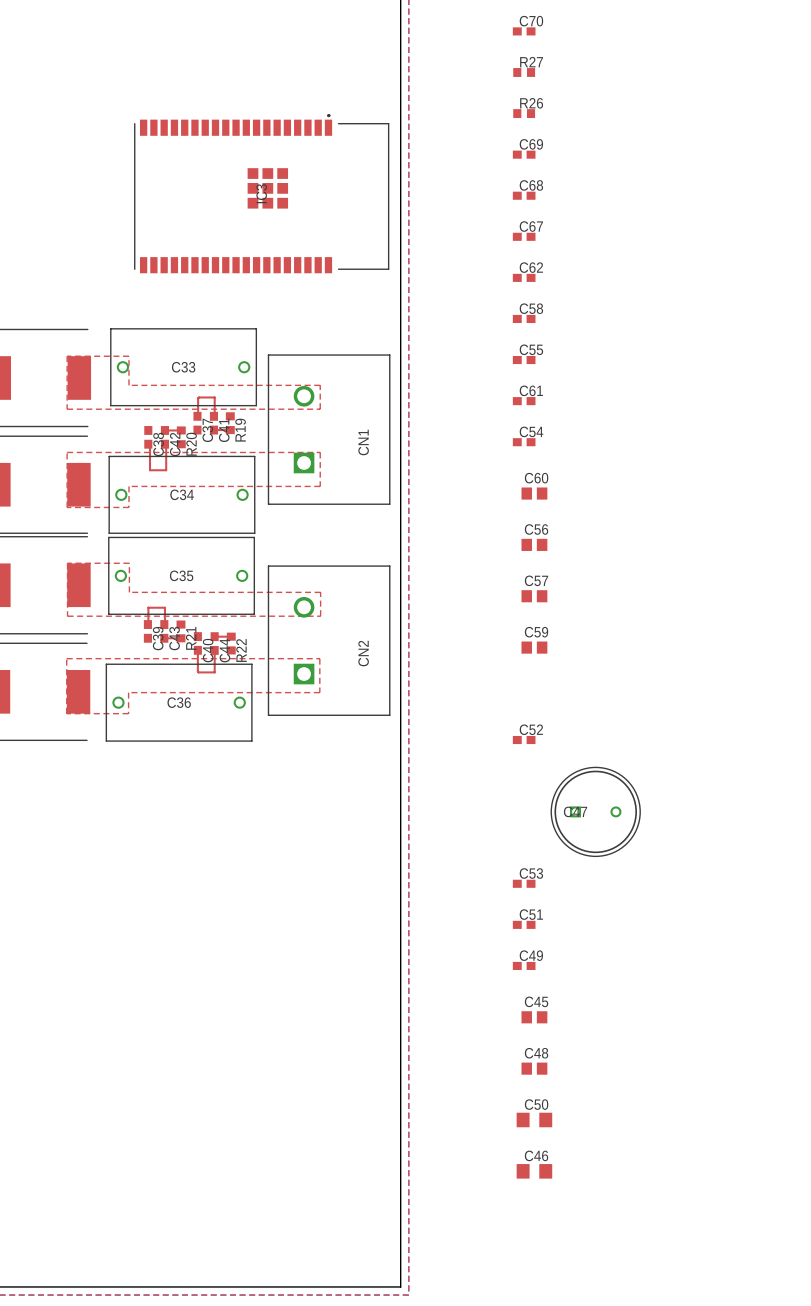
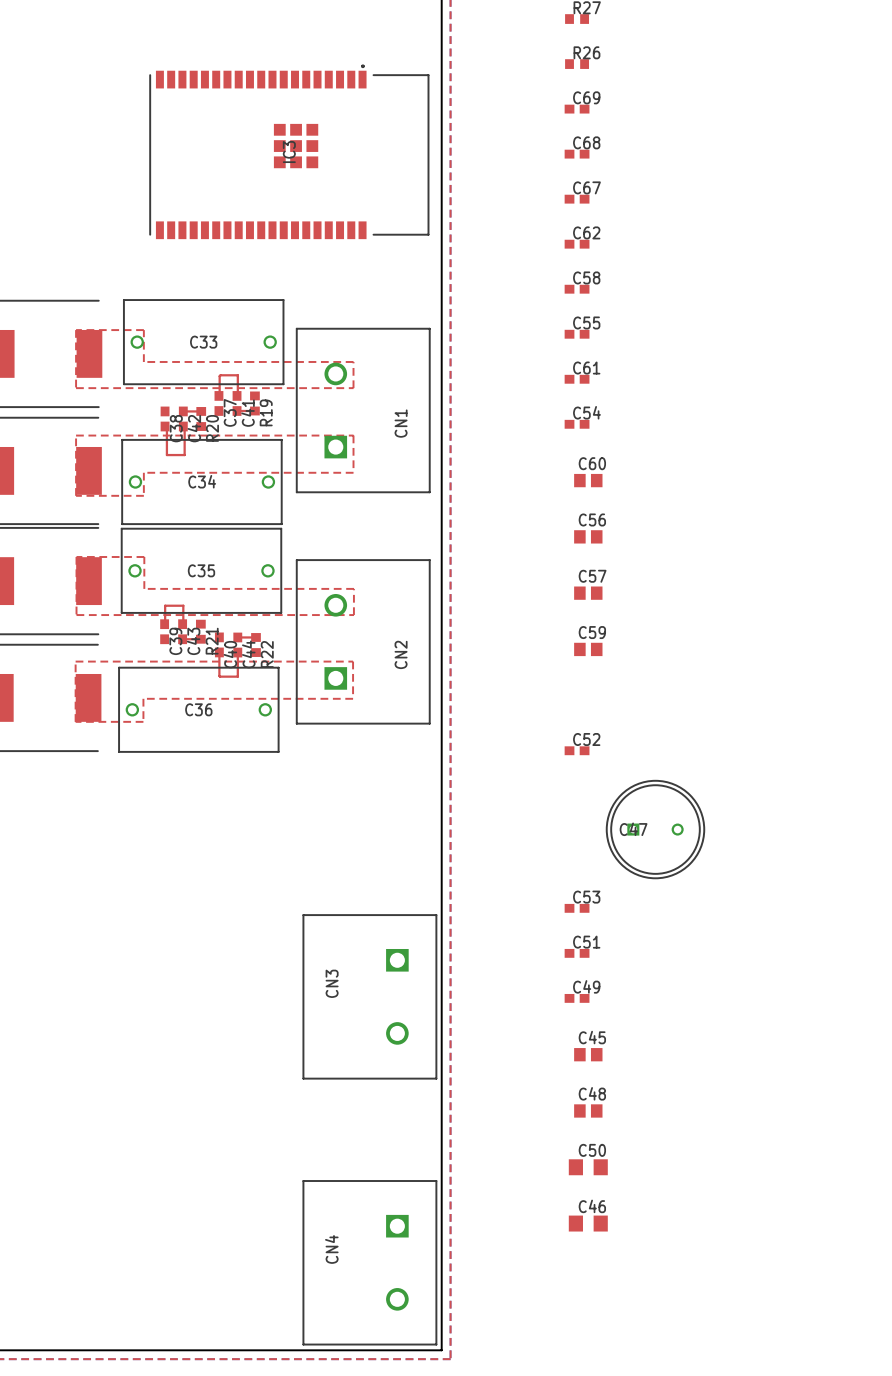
CN3: none -> (369, 996)
CN4: none -> (369, 1262)

